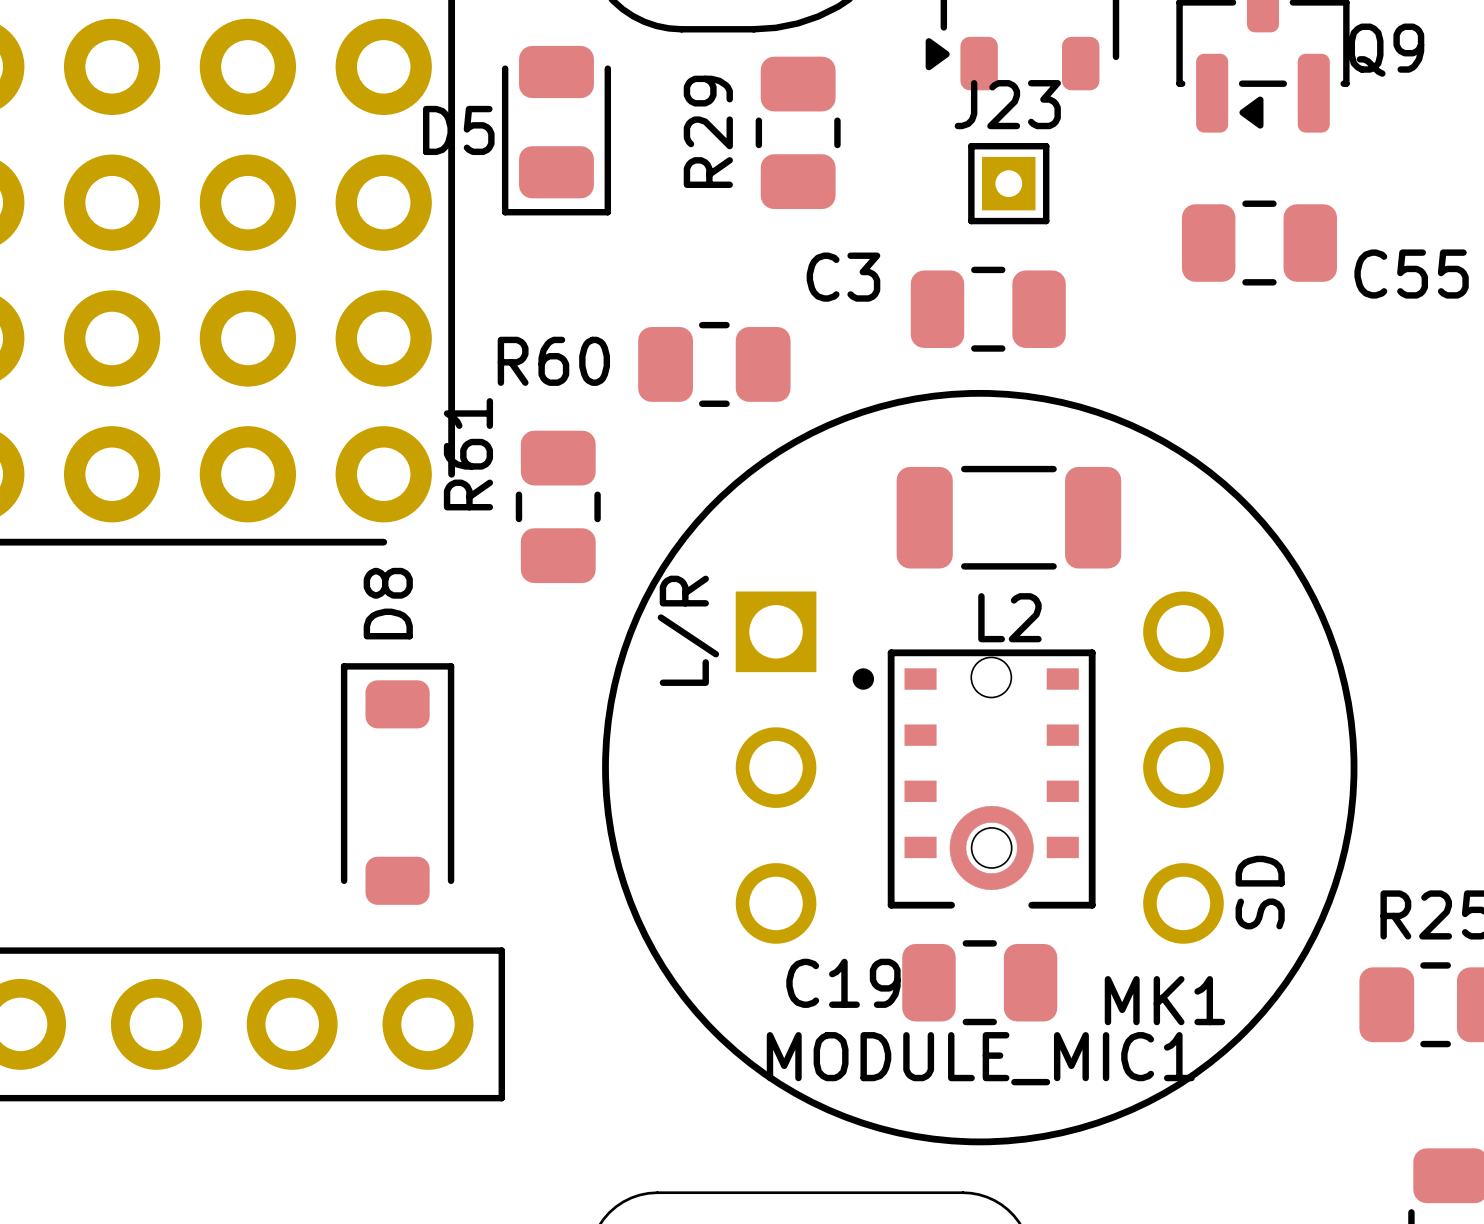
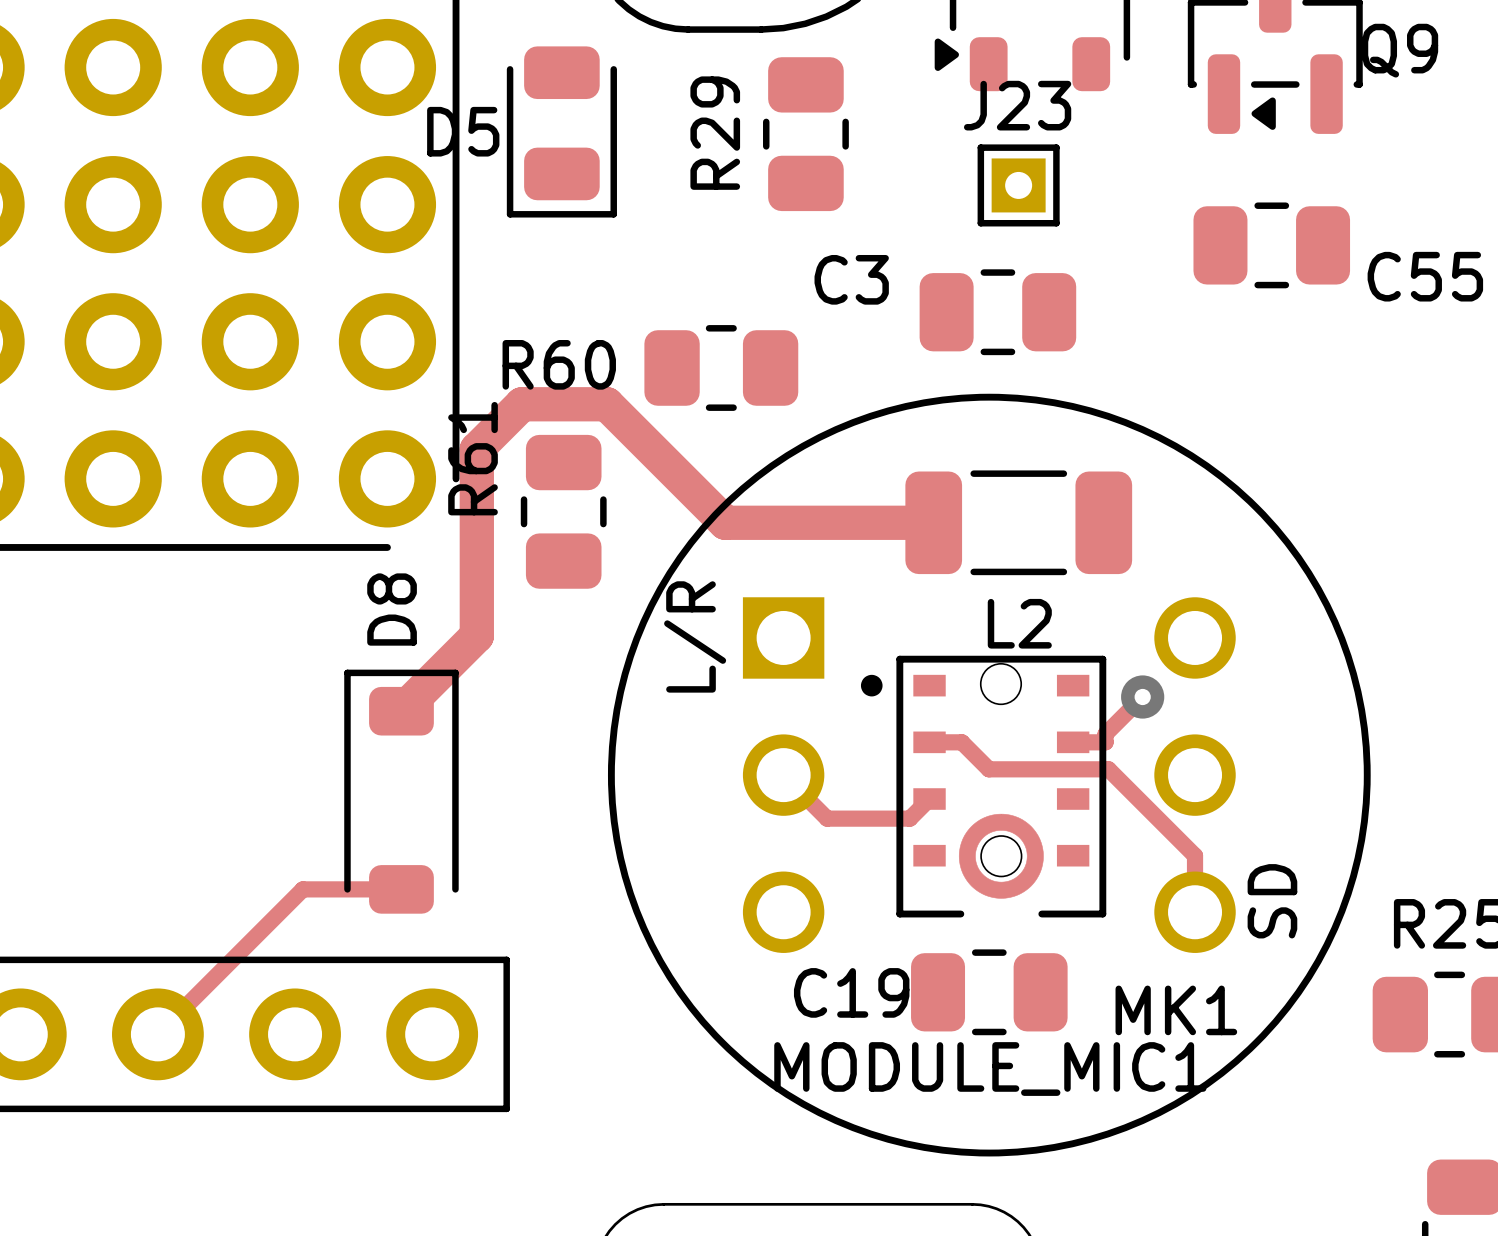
track: none -> (933, 522) (725, 522) (606, 404) (521, 404) (476, 449) (476, 635) (401, 711)
track: none -> (1142, 697) (1105, 734) (1105, 742) (1073, 742)
via: none -> (1142, 697)
track: none -> (929, 742) (961, 742) (988, 769) (1108, 769) (1195, 855) (1195, 912)
track: none -> (783, 775) (827, 818) (909, 818) (929, 799)
track: none -> (401, 889) (302, 889) (157, 1034)

